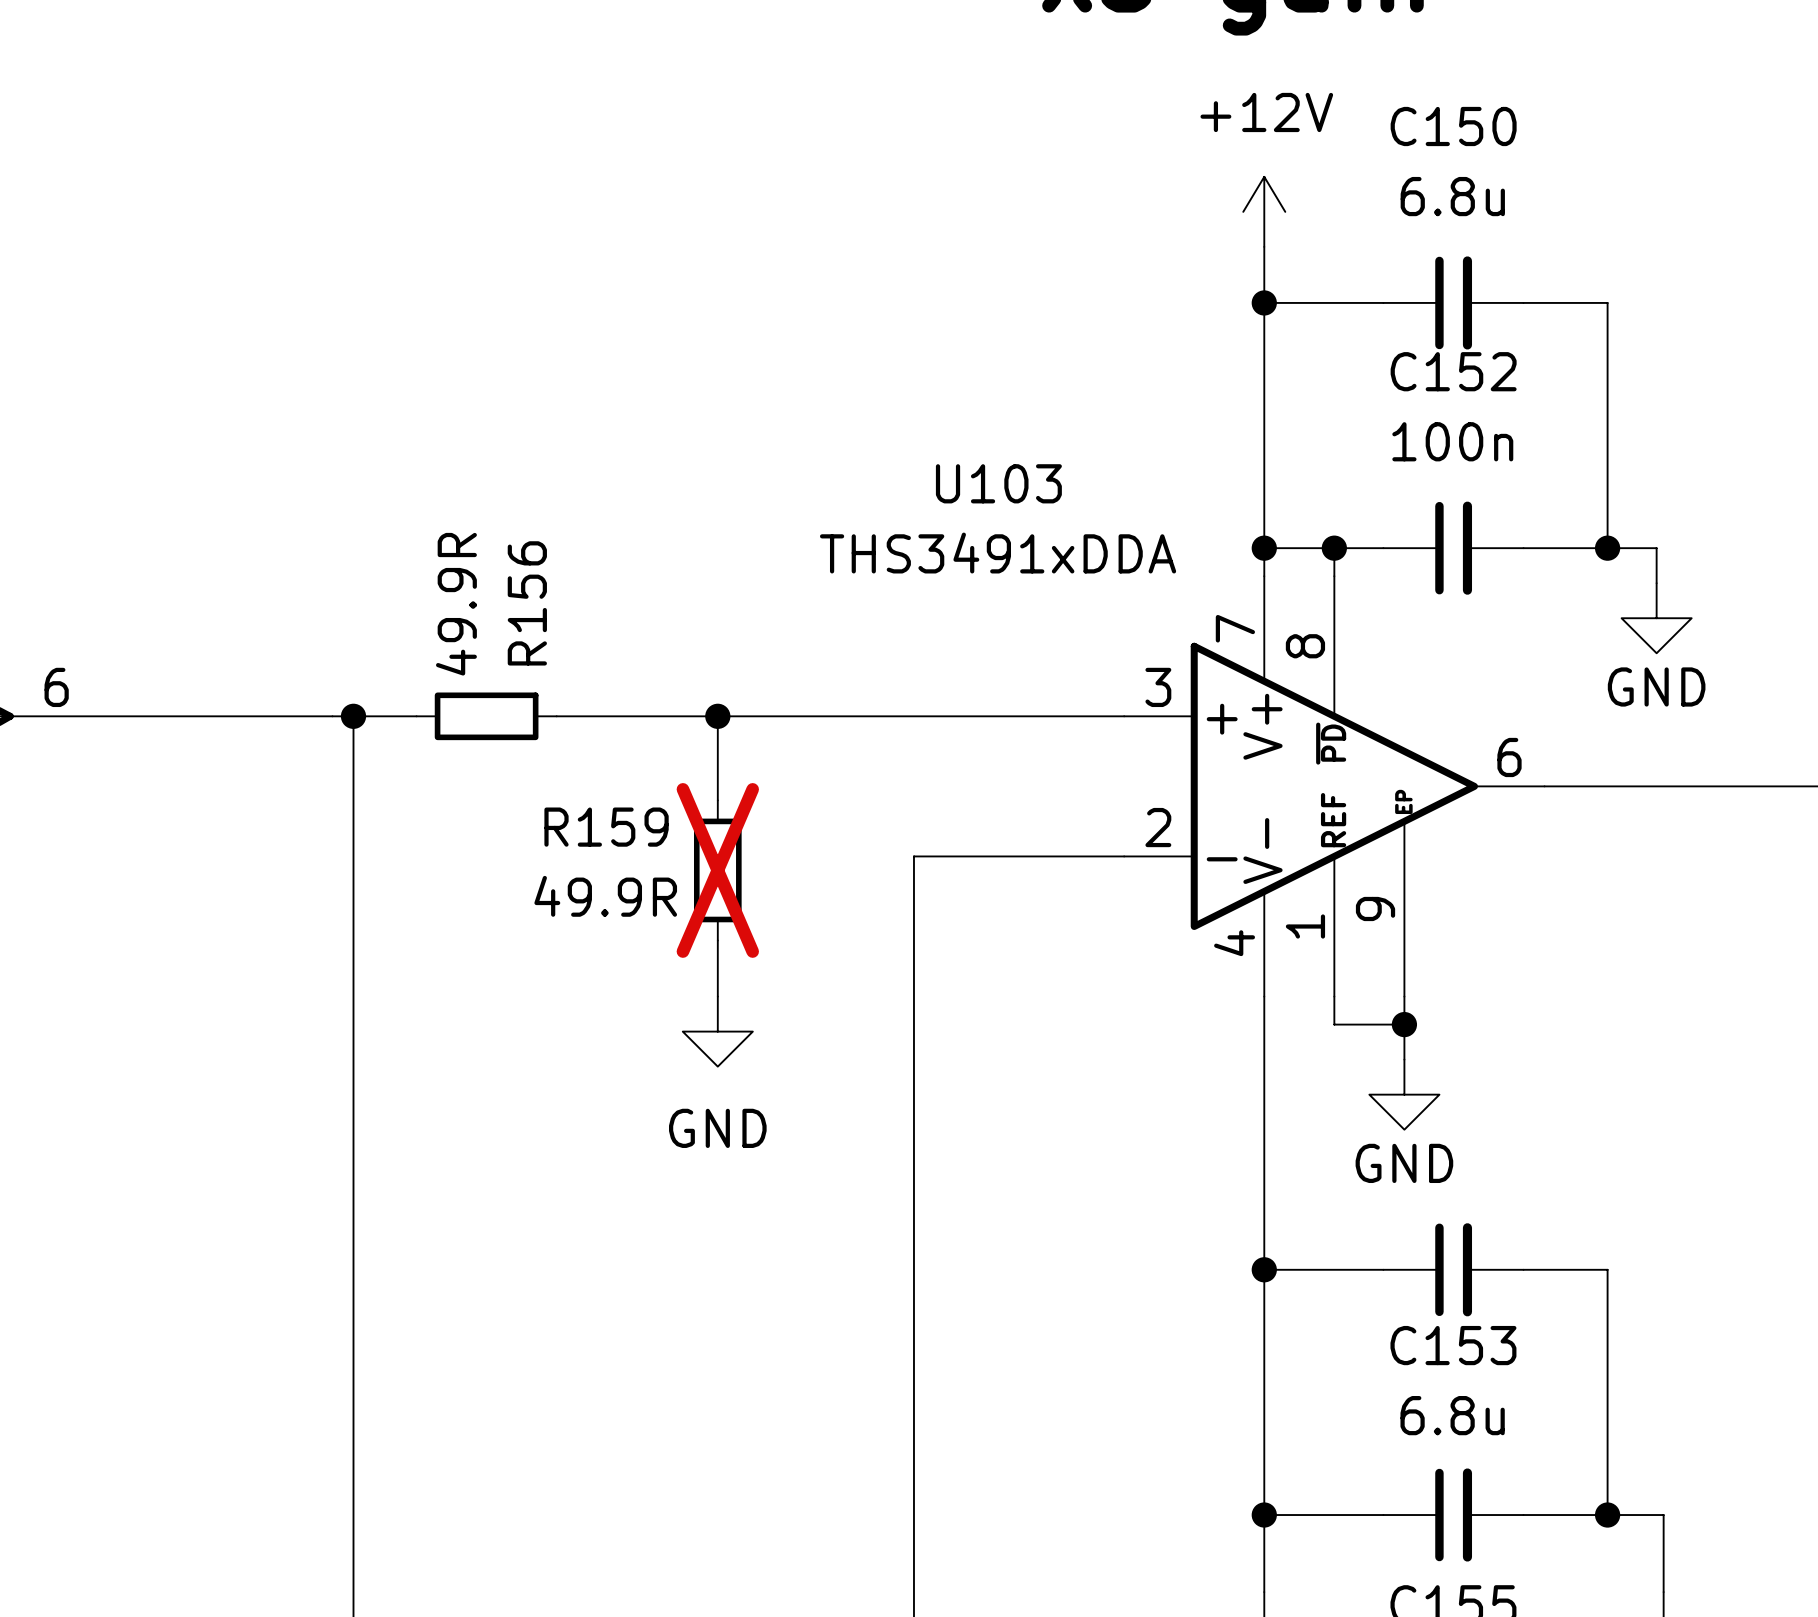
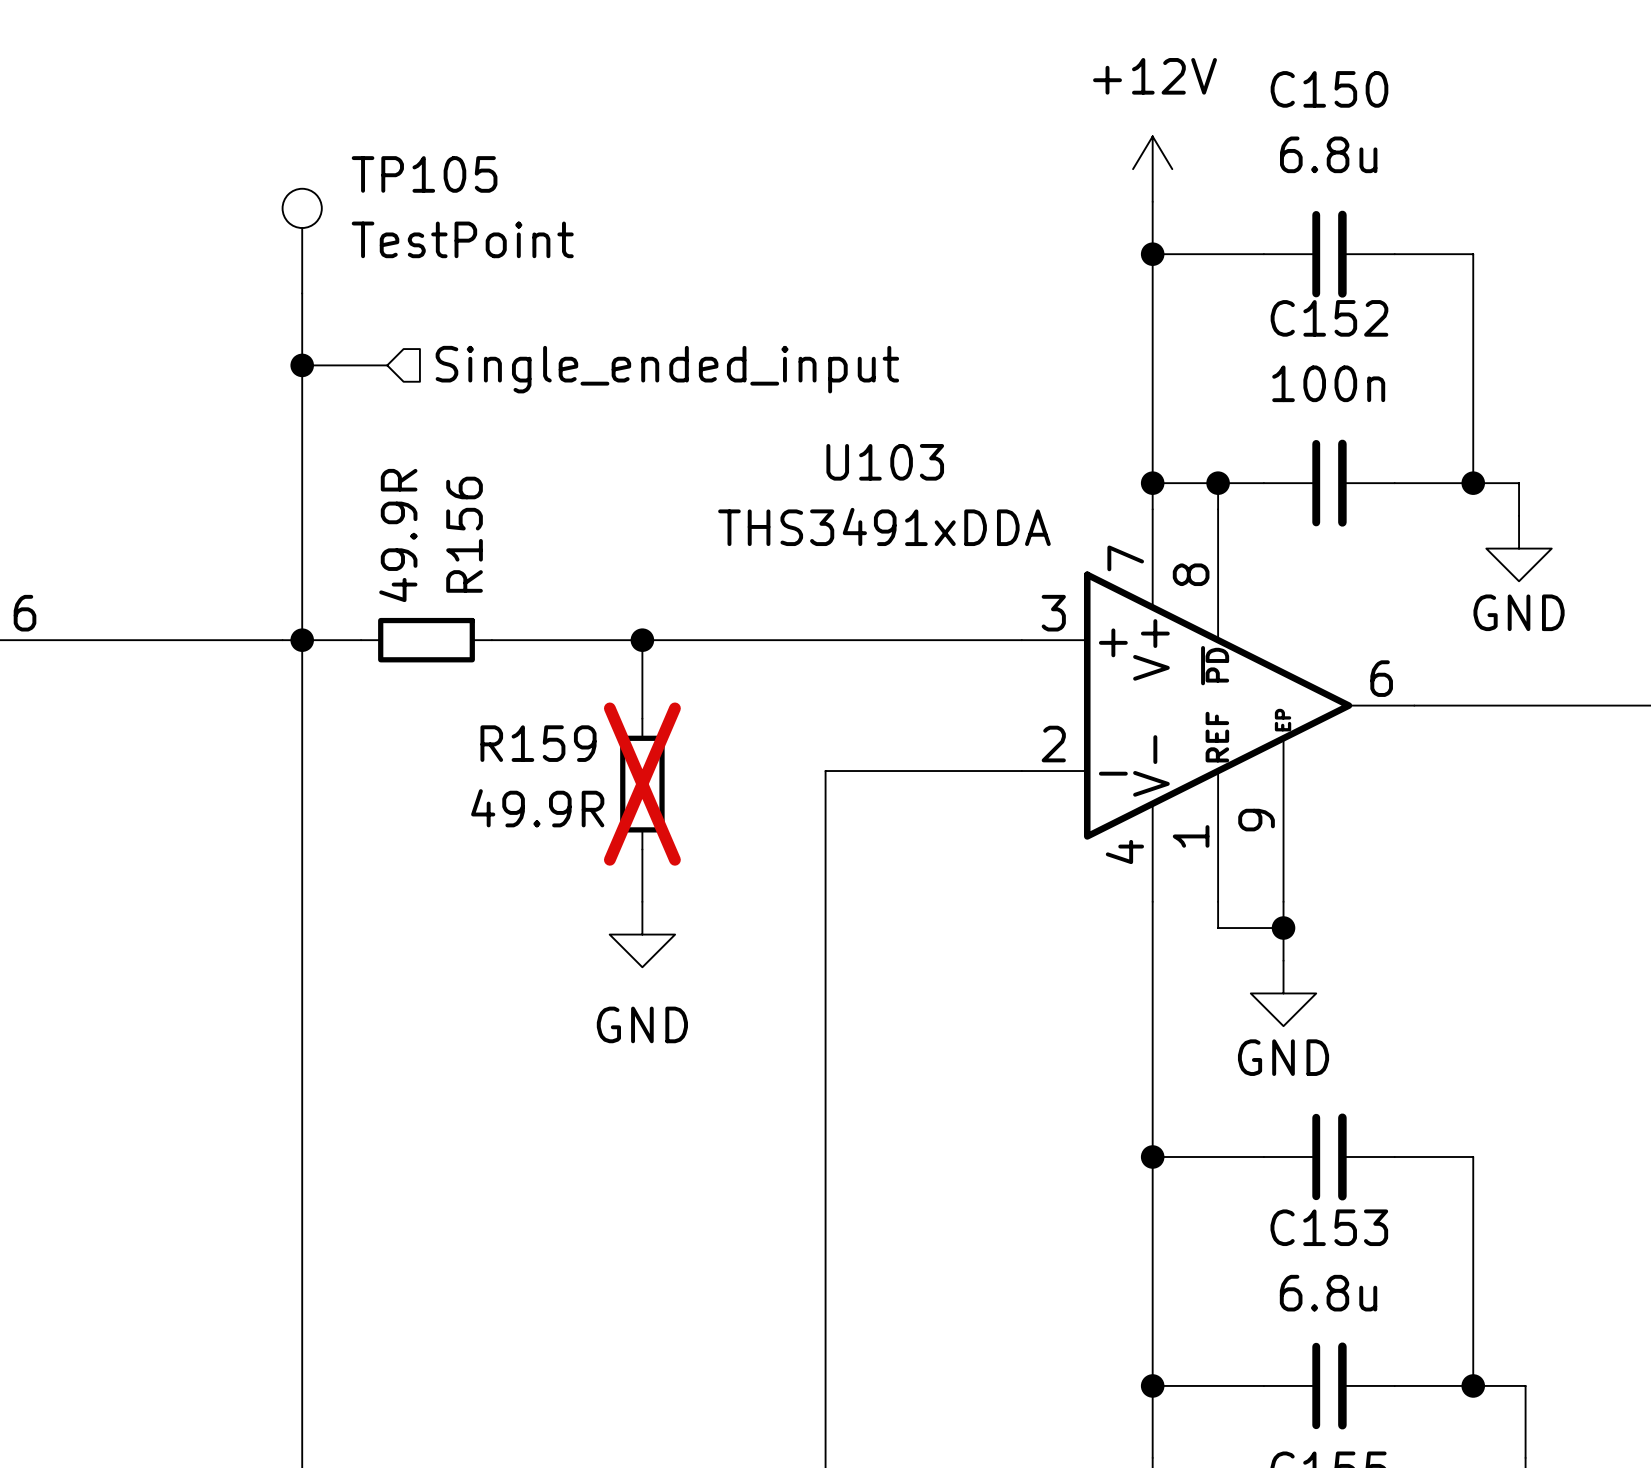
TP105: none -> TestPoint (302, 241)
wire: none -> (302, 293) (302, 640)
wire: none -> (302, 365) (387, 365)
junction: none -> (302, 365)
hierarchical label: none -> Single_ended_input (667, 369)
U103 name position: U103 (998, 483) -> U103 (885, 462)
U103 value position: THS3491xDDA (998, 553) -> THS3491xDDA (884, 526)

